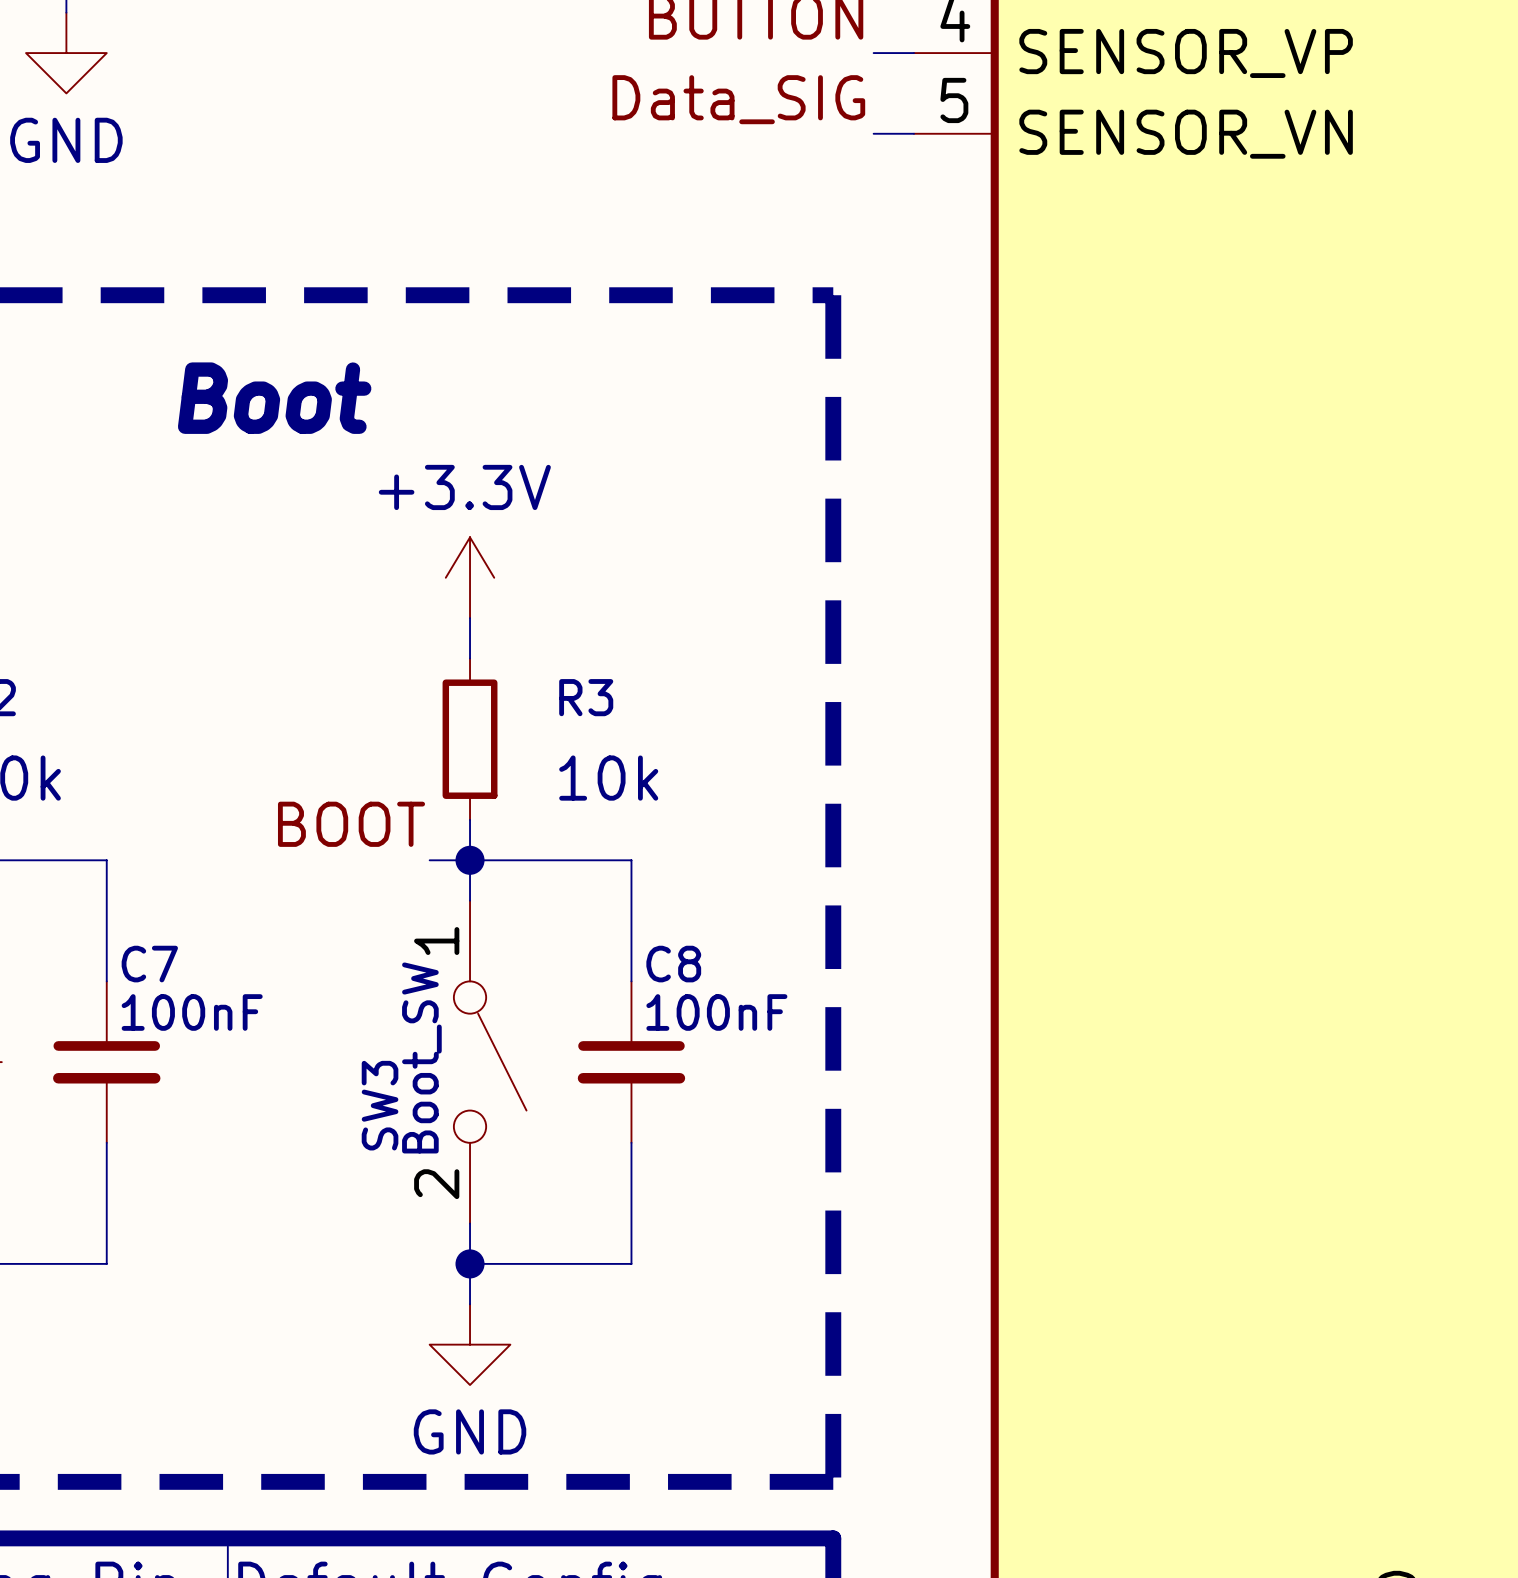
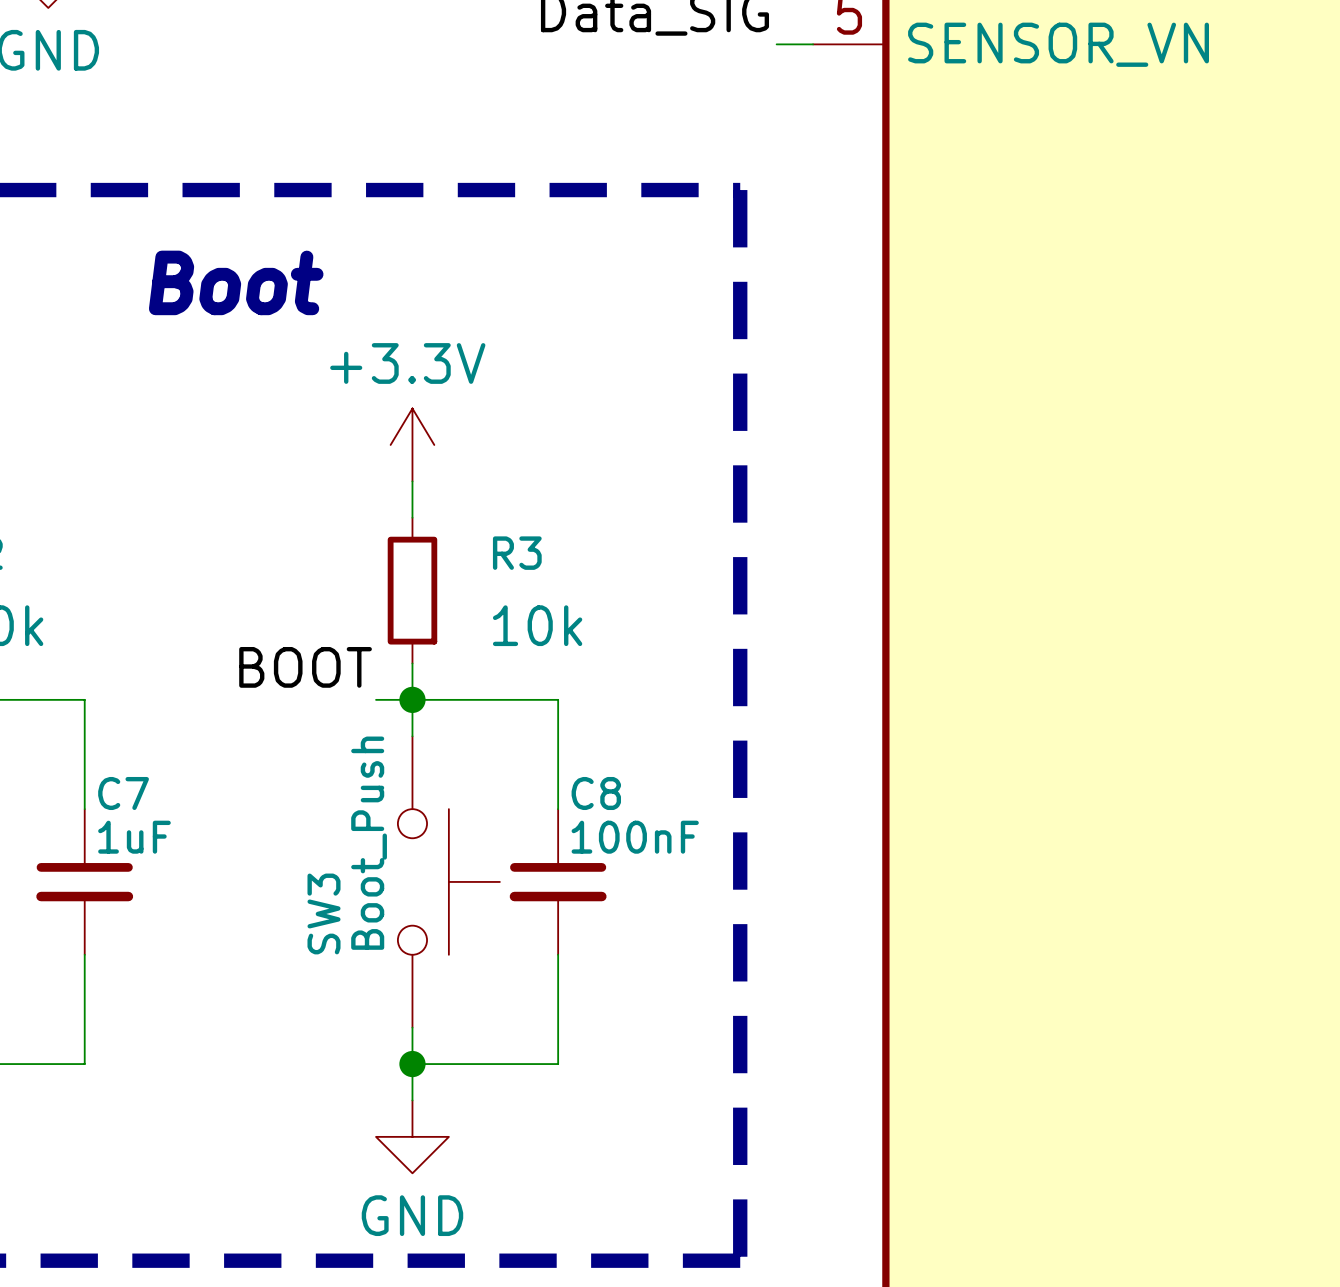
SW3 symbol: [453, 900, 527, 1224] -> [397, 736, 500, 1028]
C7 value: 100nF (192, 1012) -> 1uF (134, 837)
SW3 value: Boot_SW (421, 1057) -> Boot_Push (369, 843)

